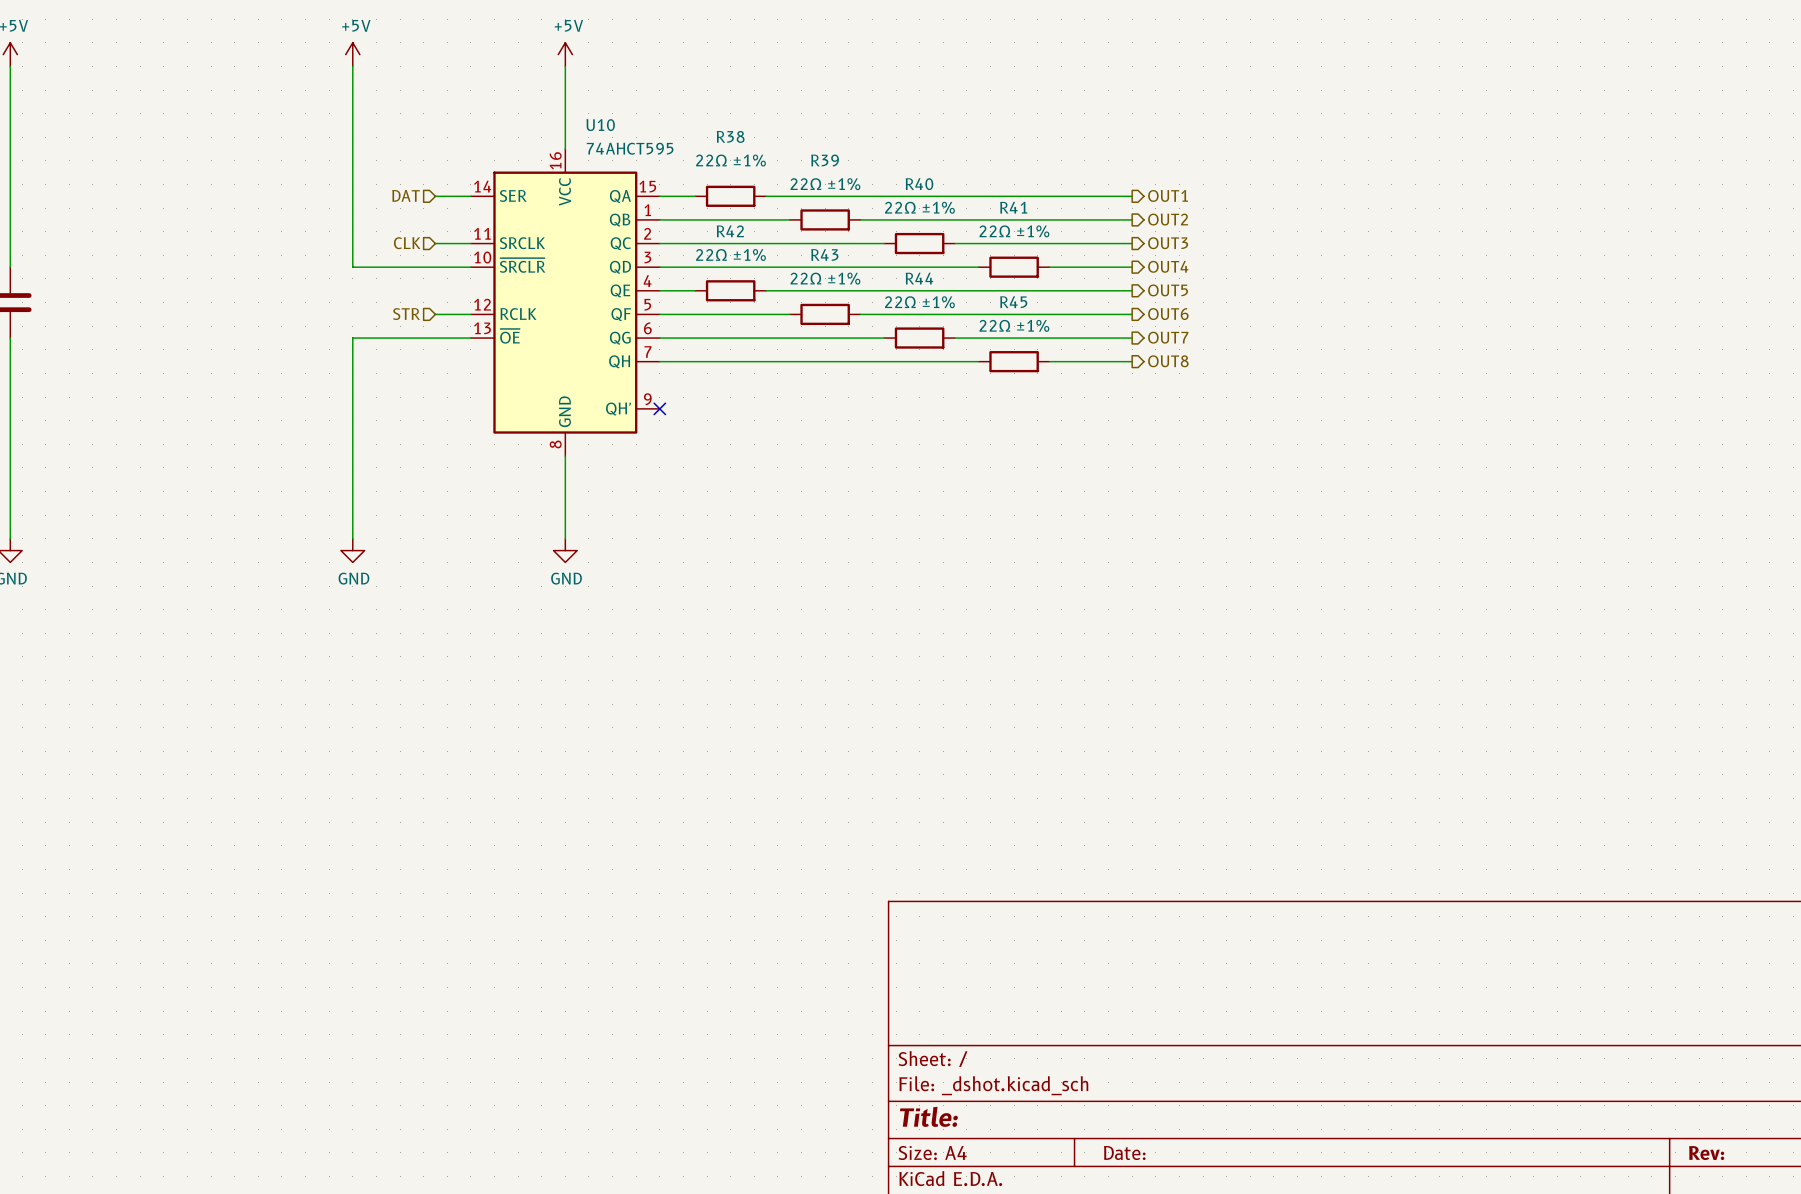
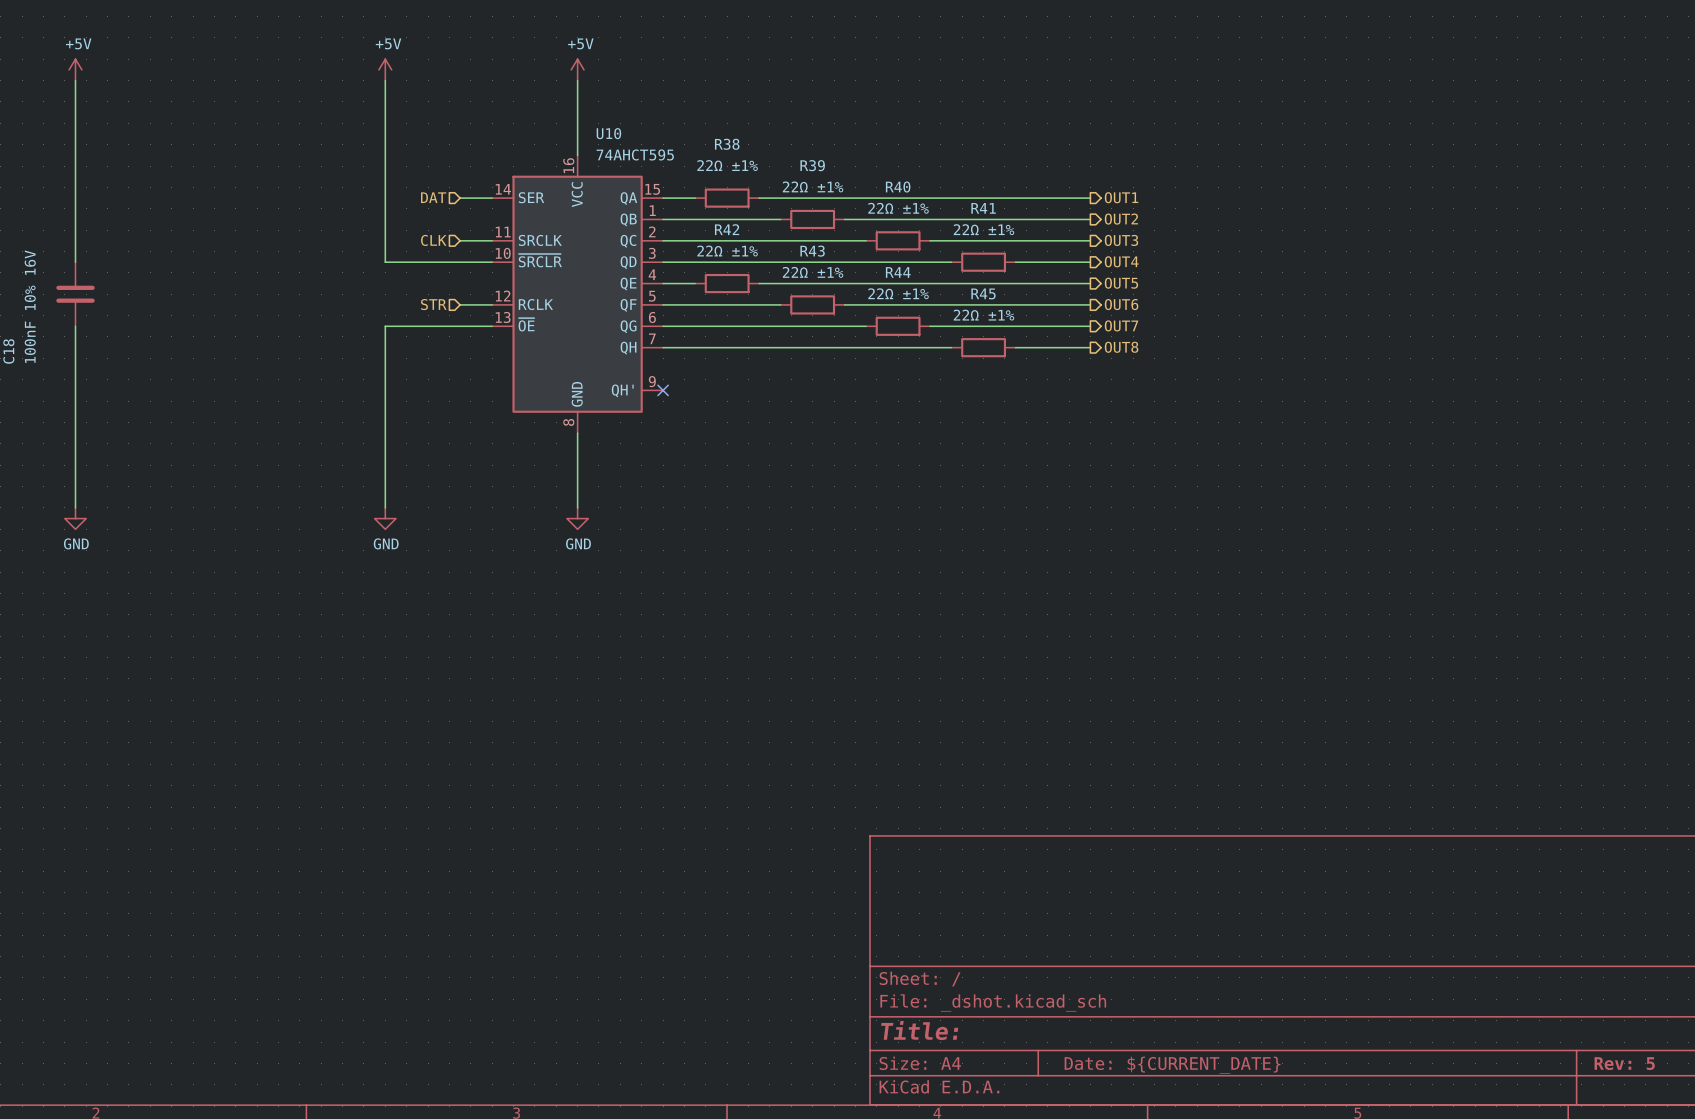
title block: Date: (1124, 1153) -> Date: ${CURRENT_DATE} (1172, 1065)
title block: Rev: (1706, 1153) -> Rev: 5 (1624, 1063)

